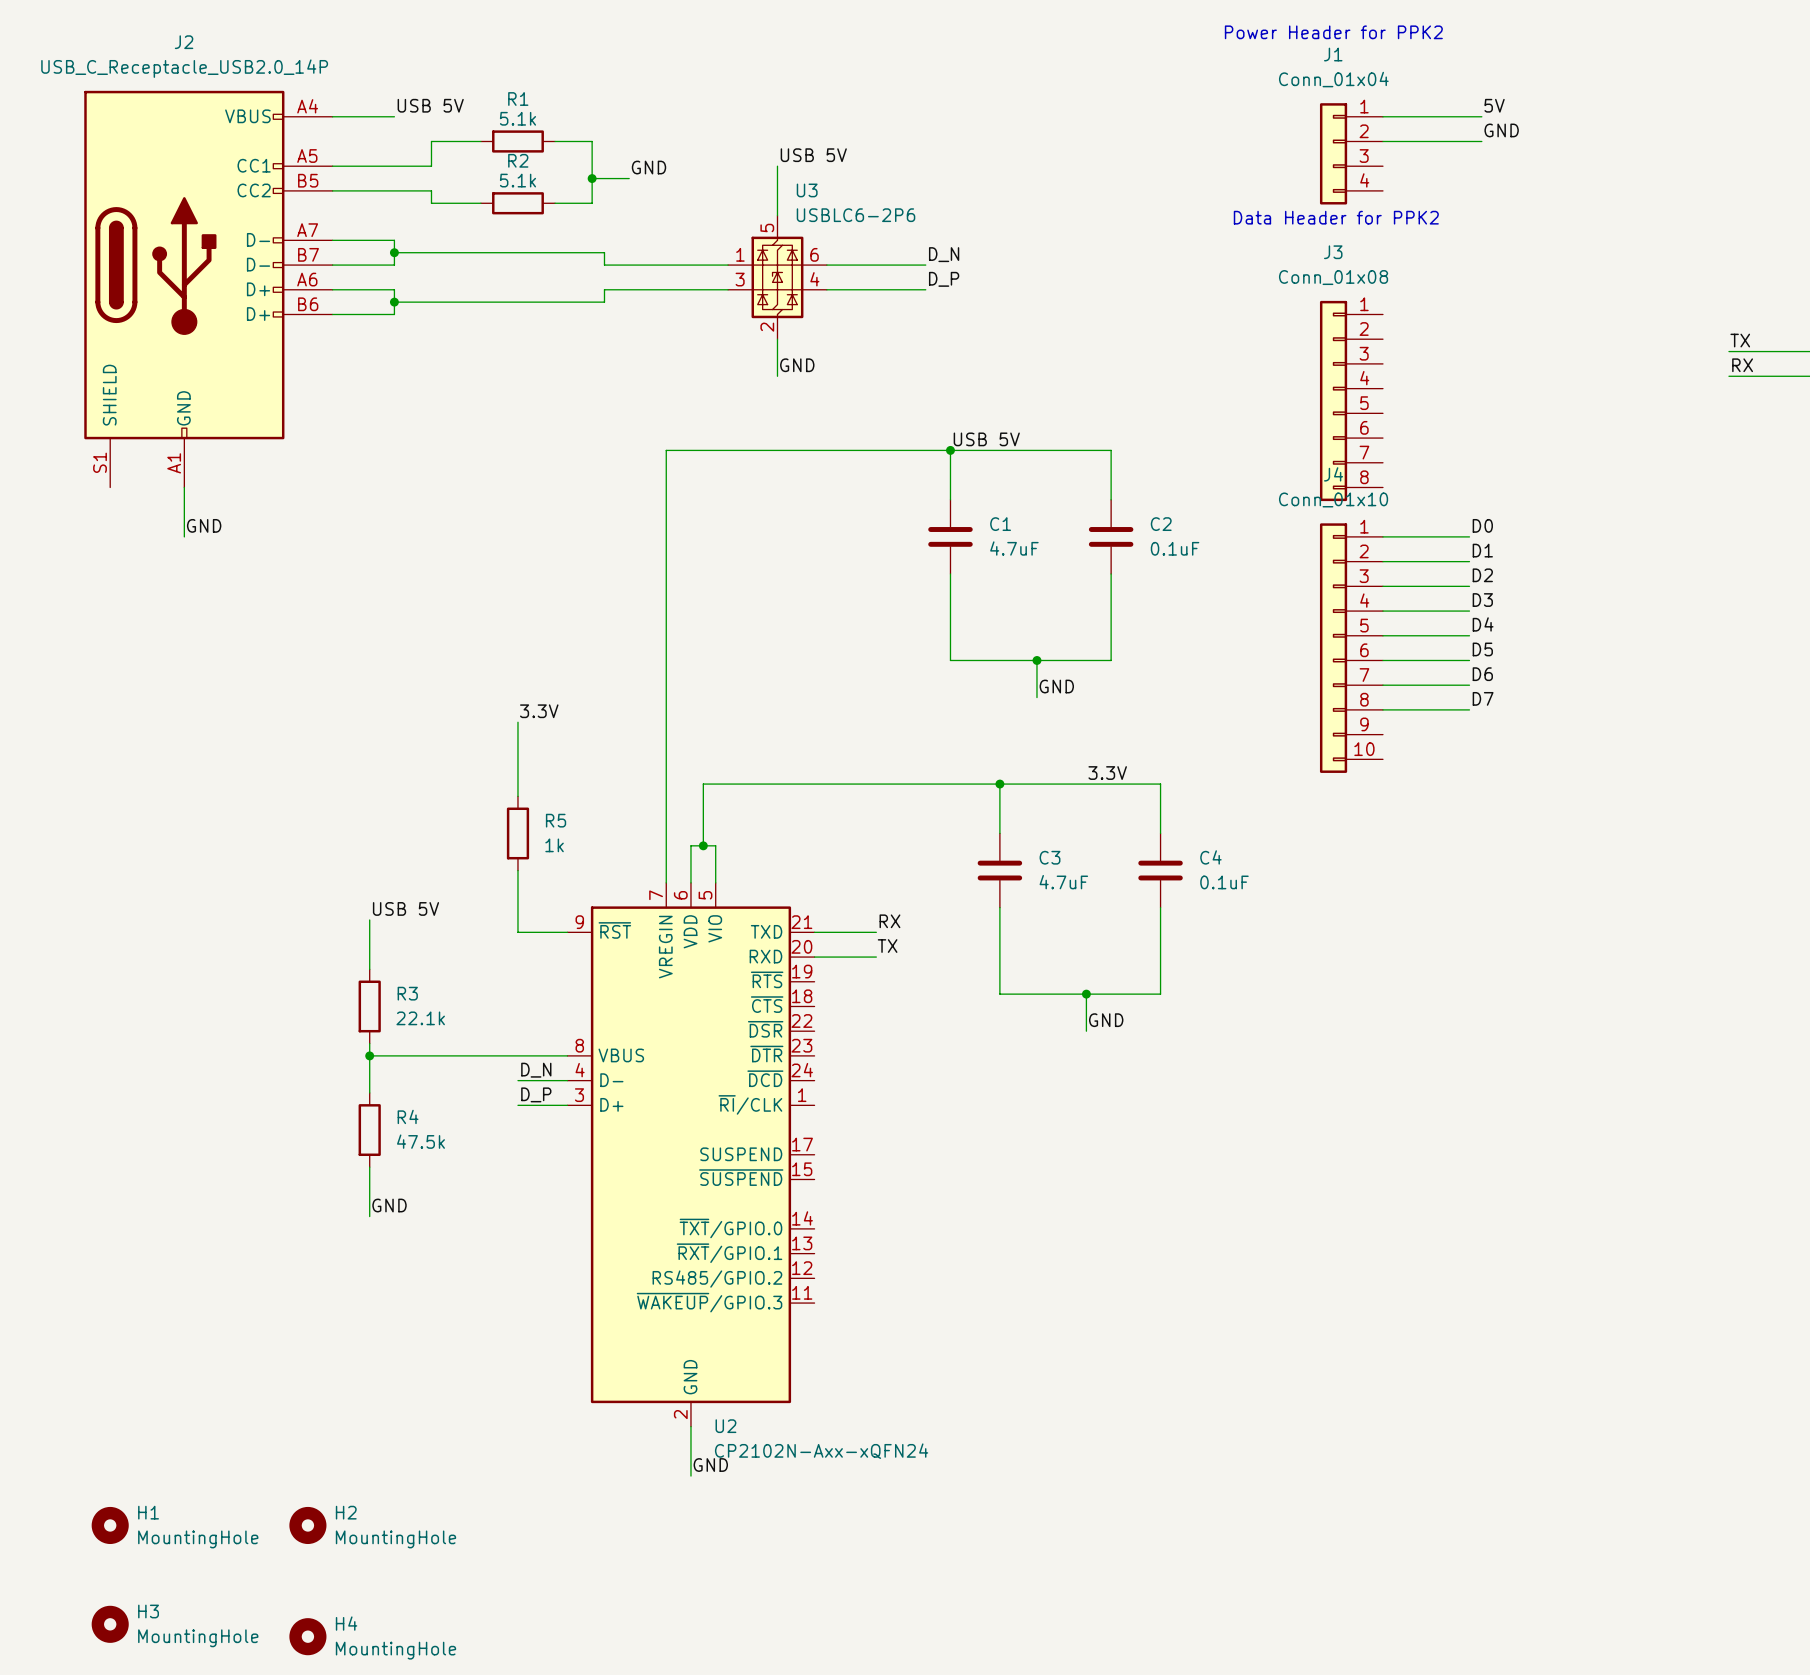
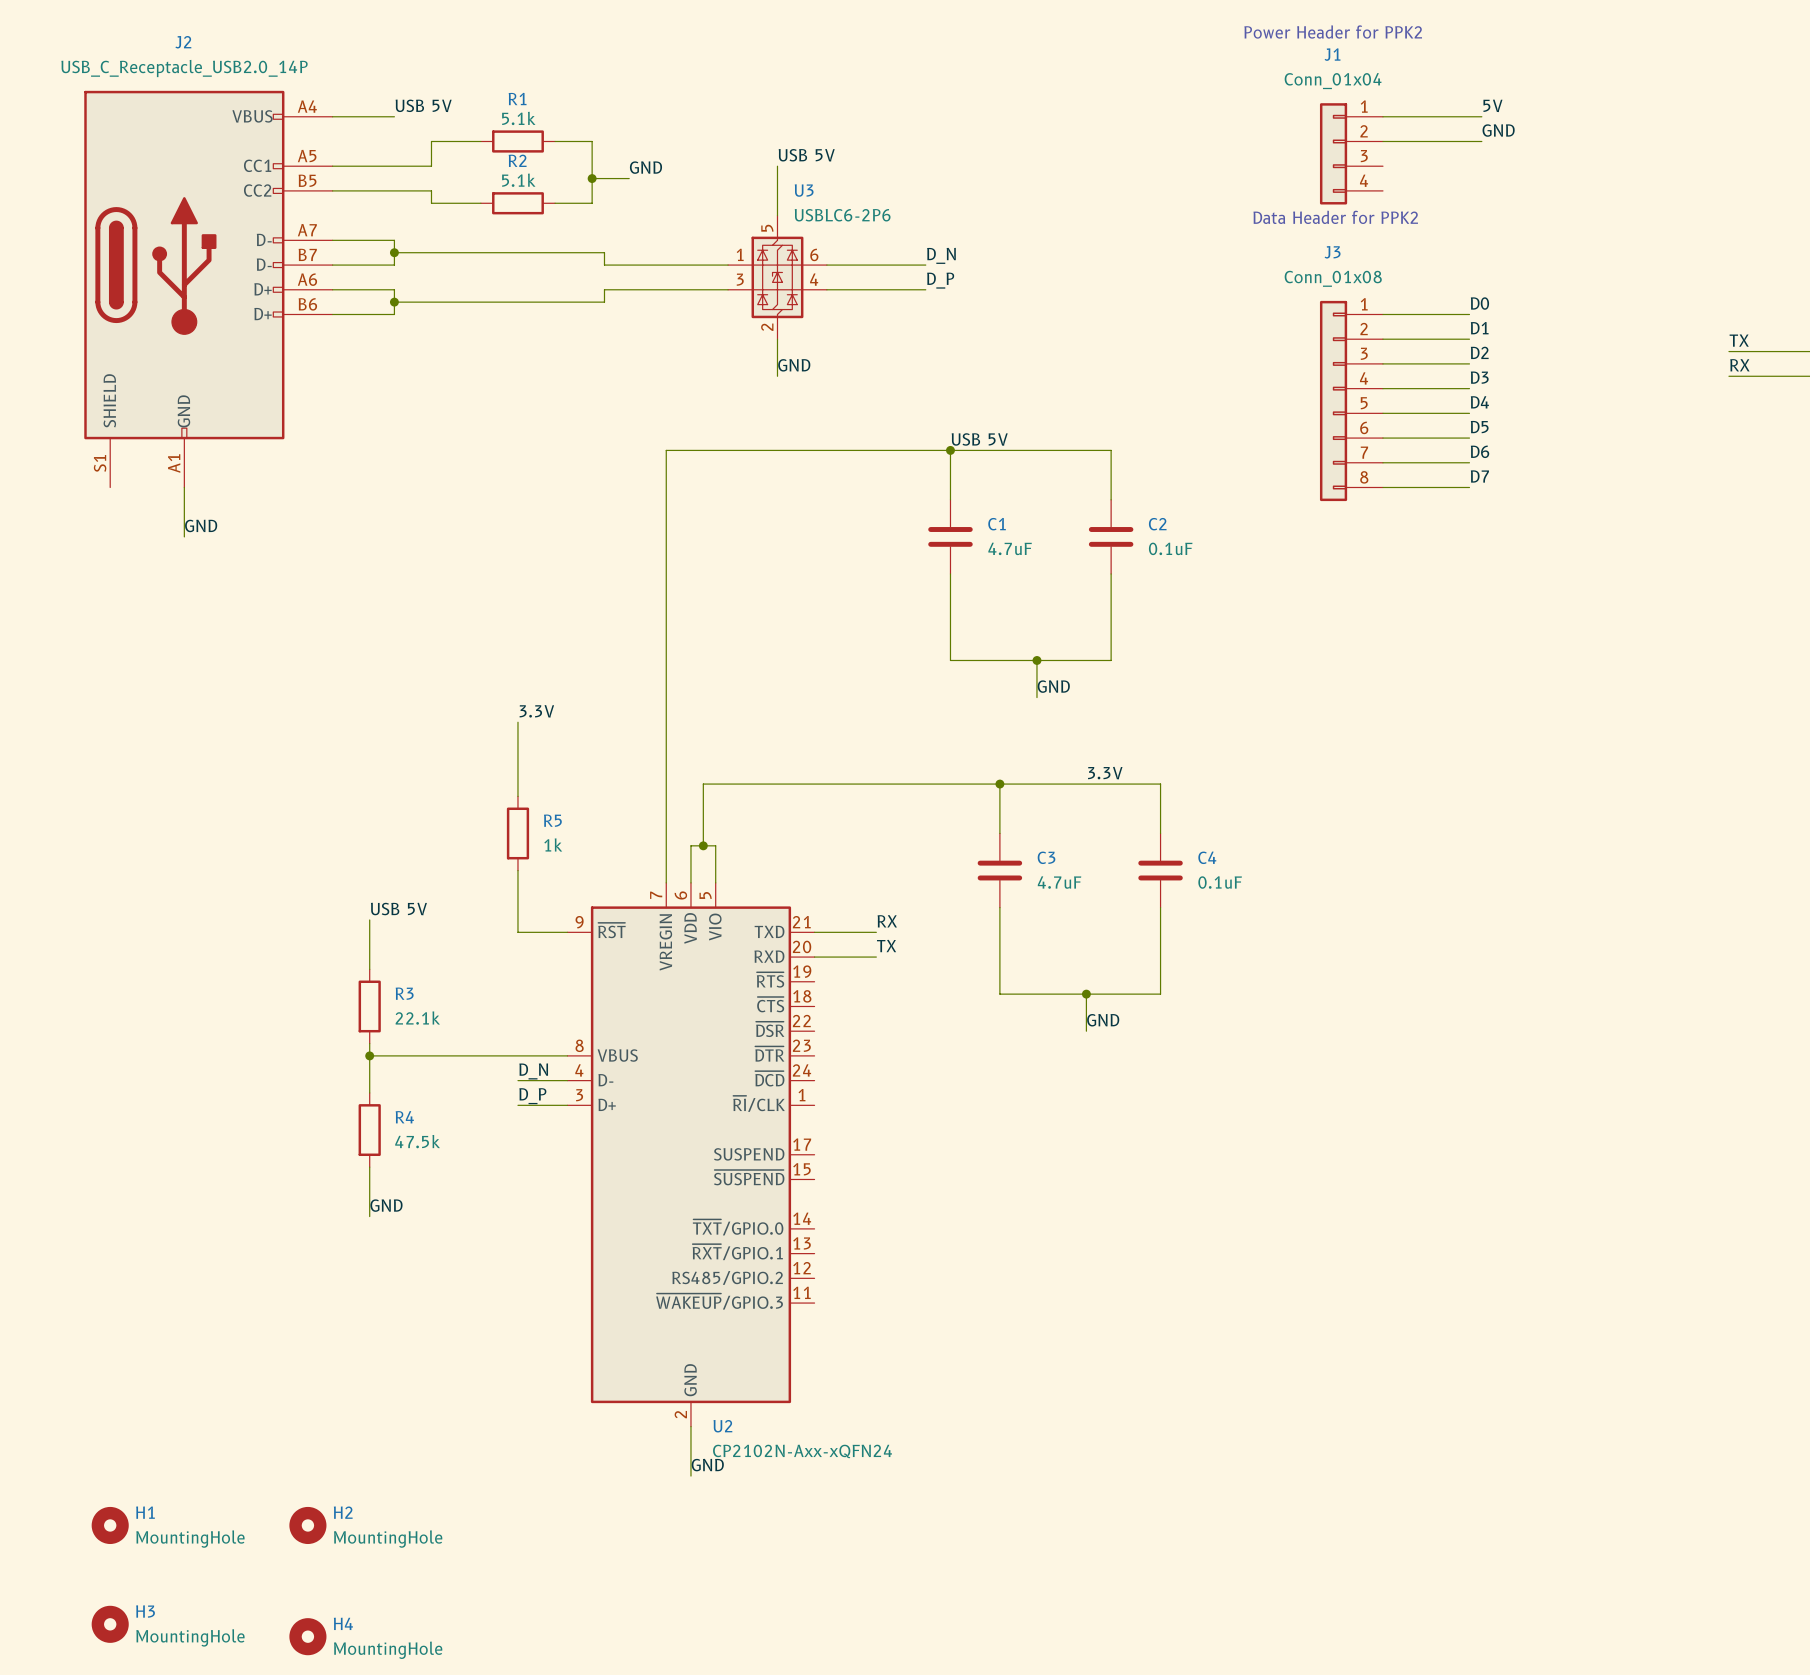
label position: D0 (1482, 525) -> D0 (1479, 303)
wire: (1382, 536) (1469, 536) -> (1382, 314) (1469, 314)
label position: D1 (1482, 550) -> D1 (1479, 328)
wire: (1382, 561) (1469, 561) -> (1382, 339) (1469, 339)
label position: D2 (1482, 575) -> D2 (1479, 352)
wire: (1382, 586) (1469, 586) -> (1382, 363) (1469, 363)
label position: D3 (1482, 600) -> D3 (1479, 377)
wire: (1382, 611) (1469, 611) -> (1382, 388) (1469, 388)
label position: D4 (1483, 624) -> D4 (1479, 402)
wire: (1382, 635) (1469, 635) -> (1382, 413) (1469, 413)
J4: Conn_01x10 (1351, 648) -> none
label position: D5 (1482, 649) -> D5 (1479, 427)
wire: (1382, 660) (1469, 660) -> (1382, 438) (1469, 438)
label position: D6 (1482, 674) -> D6 (1480, 451)
wire: (1382, 685) (1469, 685) -> (1382, 462) (1469, 462)
label position: D7 (1483, 698) -> D7 (1479, 476)
wire: (1382, 709) (1469, 709) -> (1382, 487) (1469, 487)

